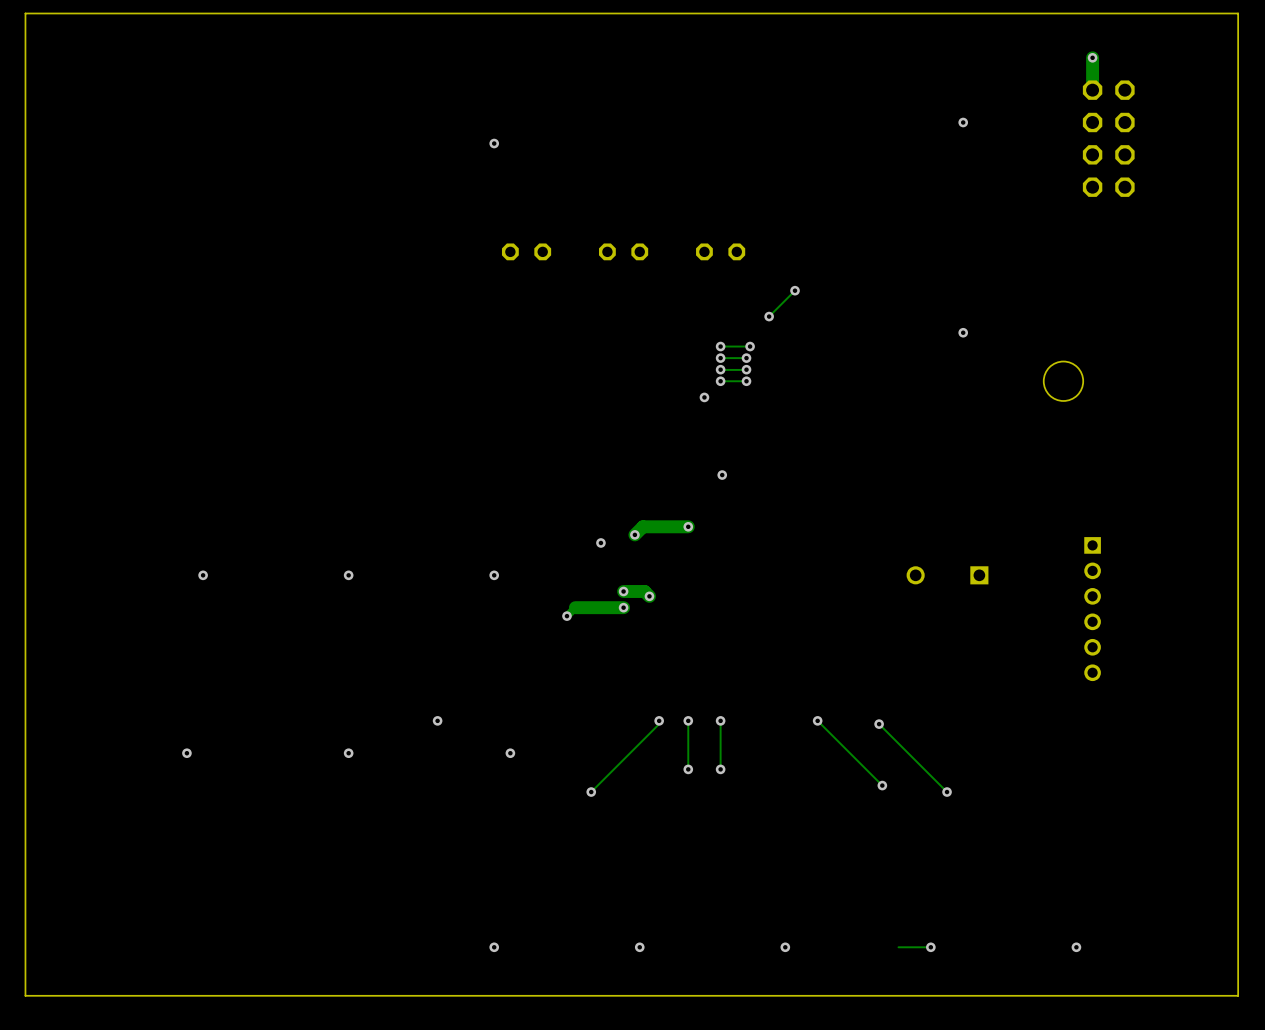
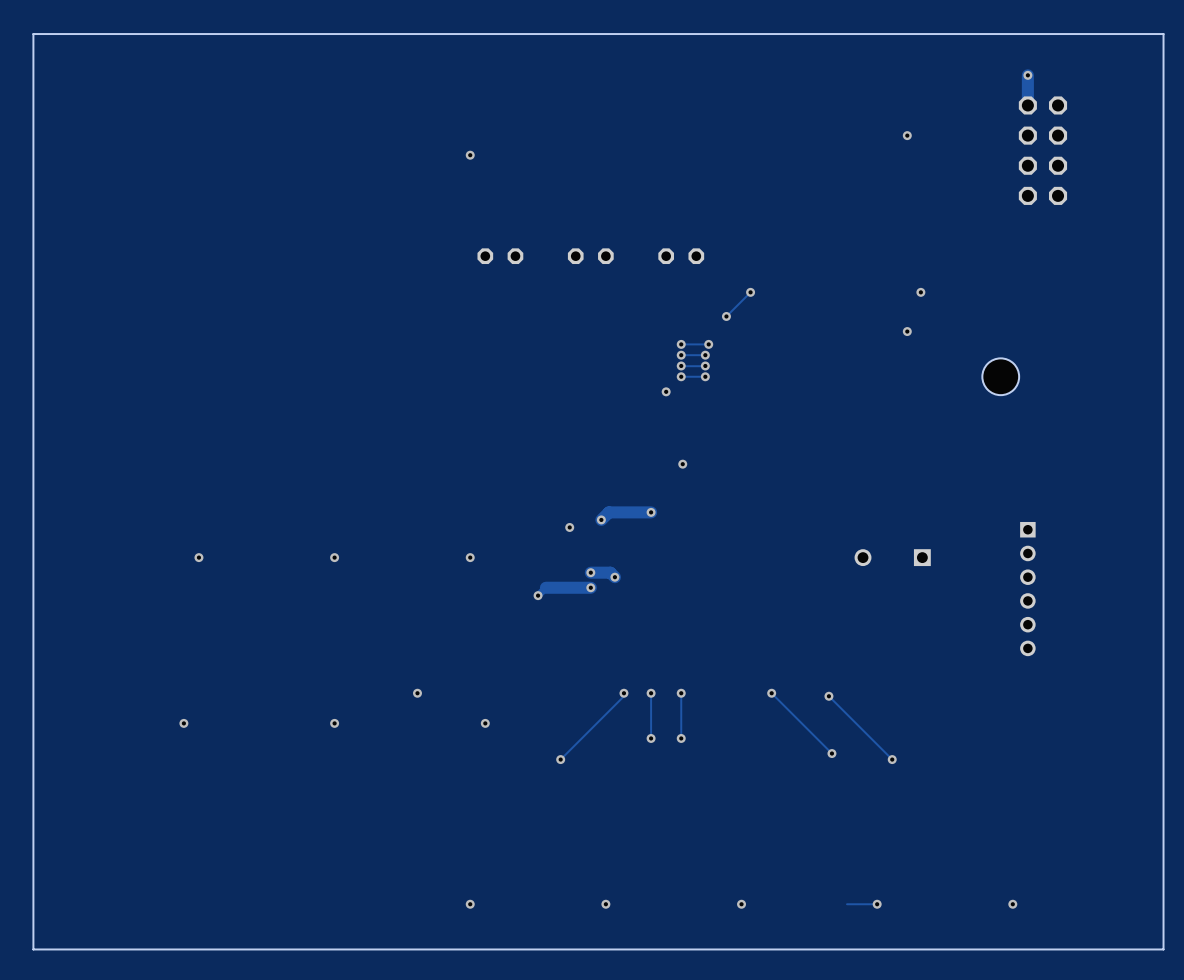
via: none -> (920, 292)

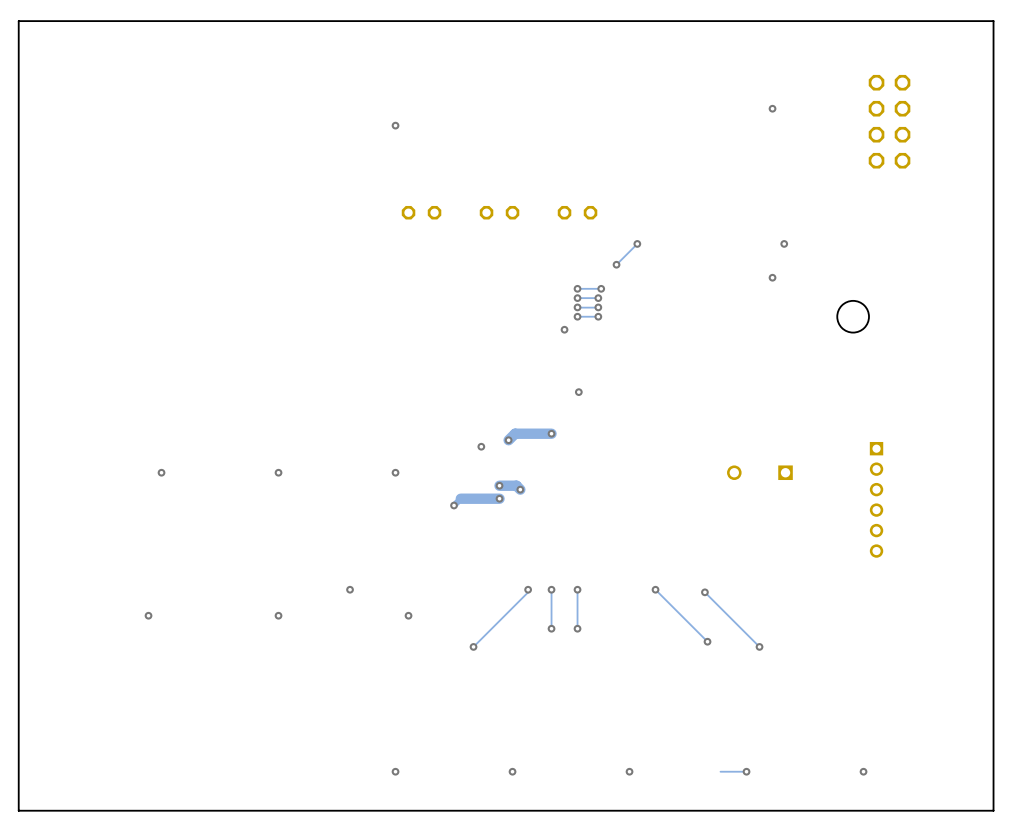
track: (1027, 75) (1027, 105) -> none
via: (1027, 75) -> none

